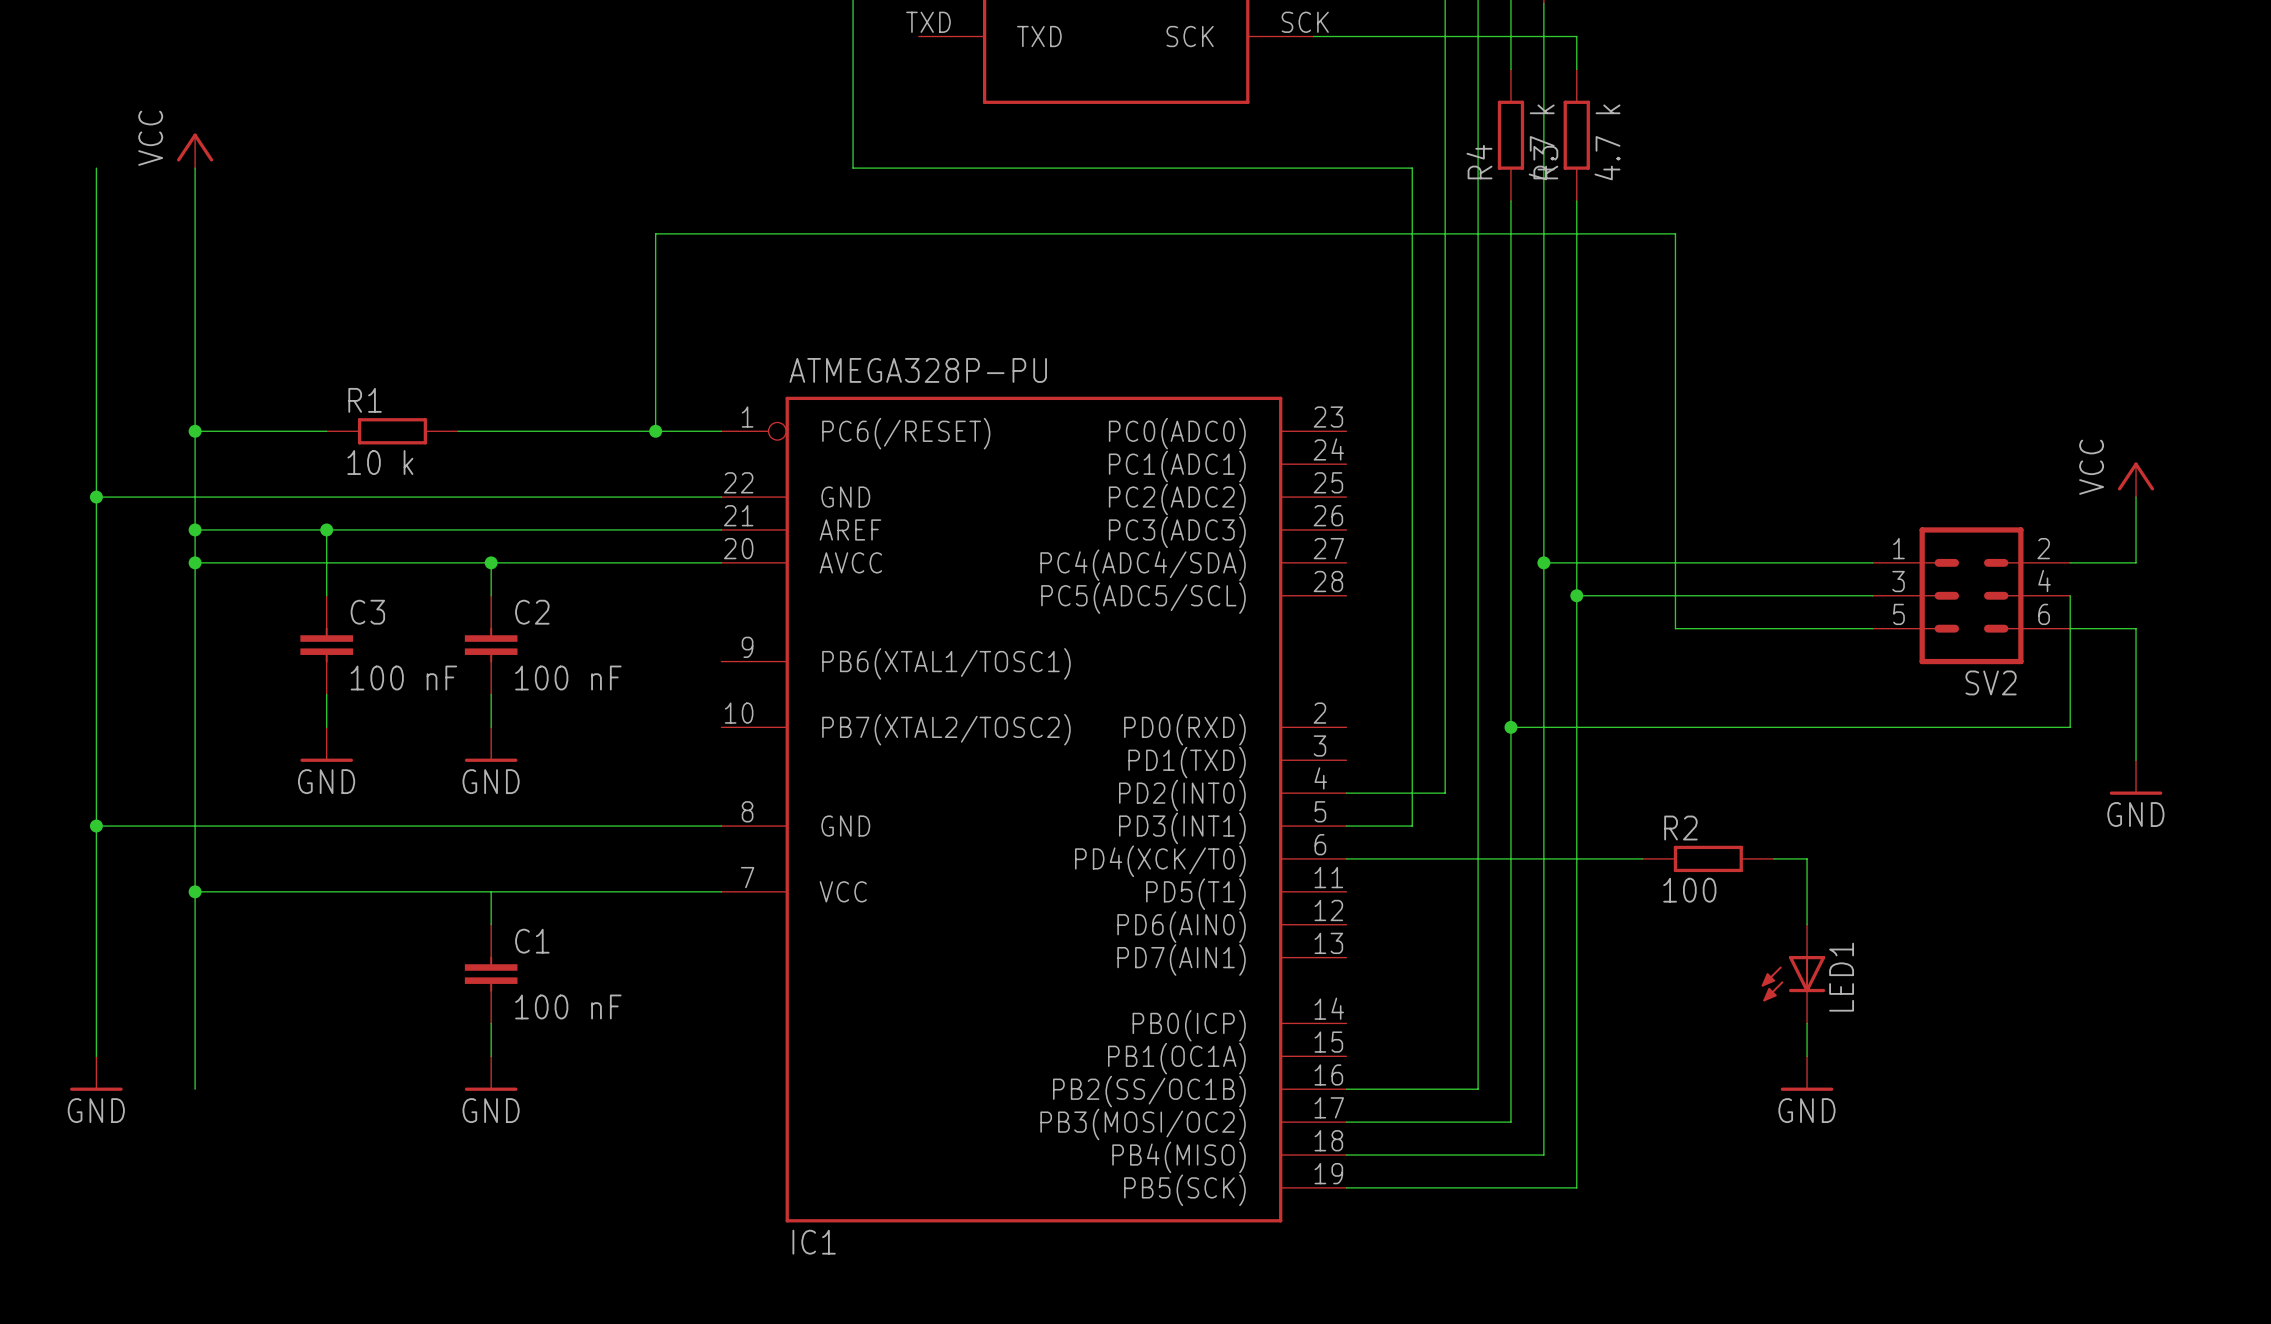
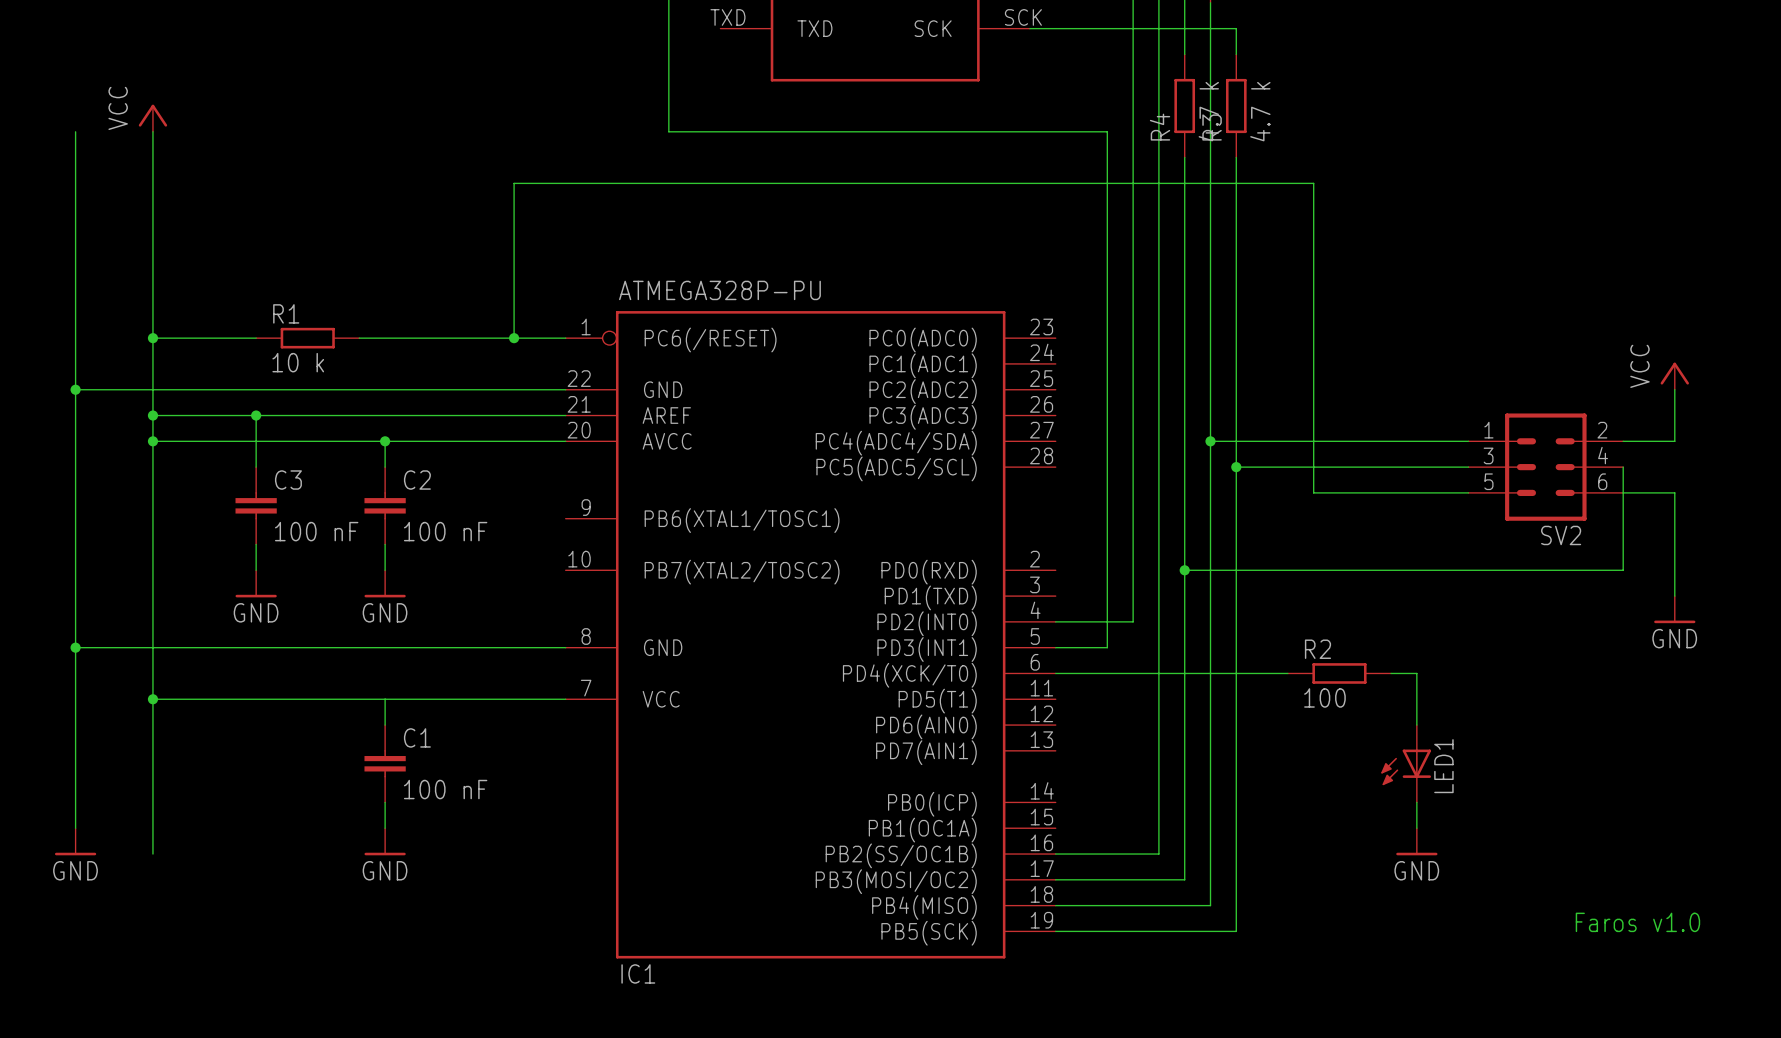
text: none -> Faros v1.0 (1637, 922)

